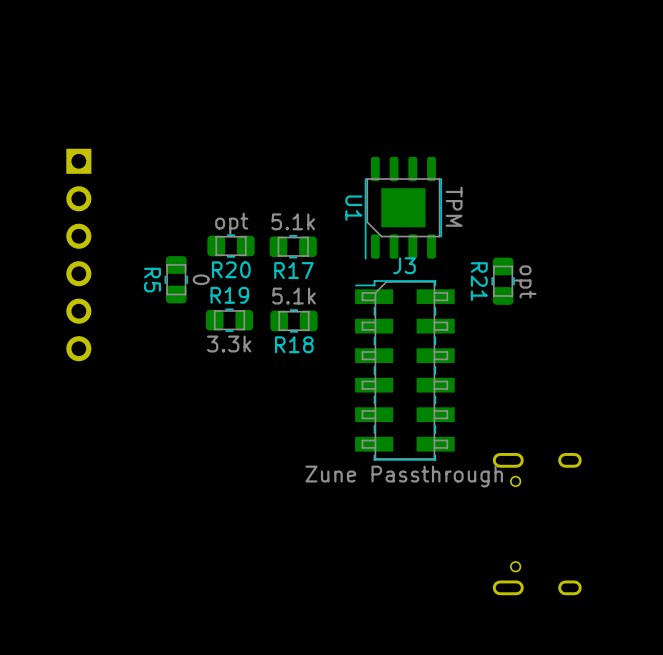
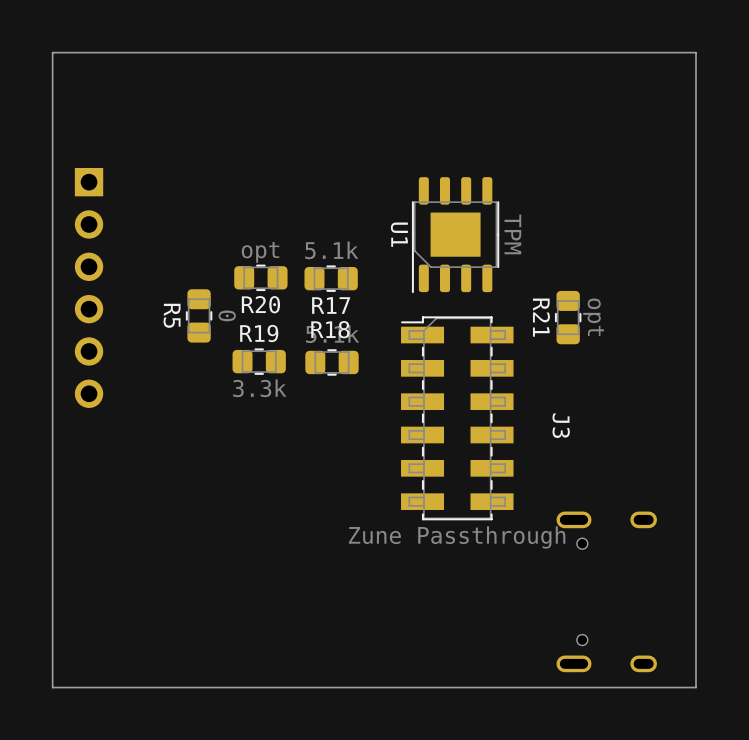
board edge: none -> (696, 52) (52, 52) (52, 687) (696, 687) (696, 52)
J3 name rotation: 0° (404, 265) -> 90° clockwise (561, 425)
J3 name position: J3 (404, 265) -> J3 (561, 425)
R18 name position: R18 (294, 344) -> R18 (330, 329)

